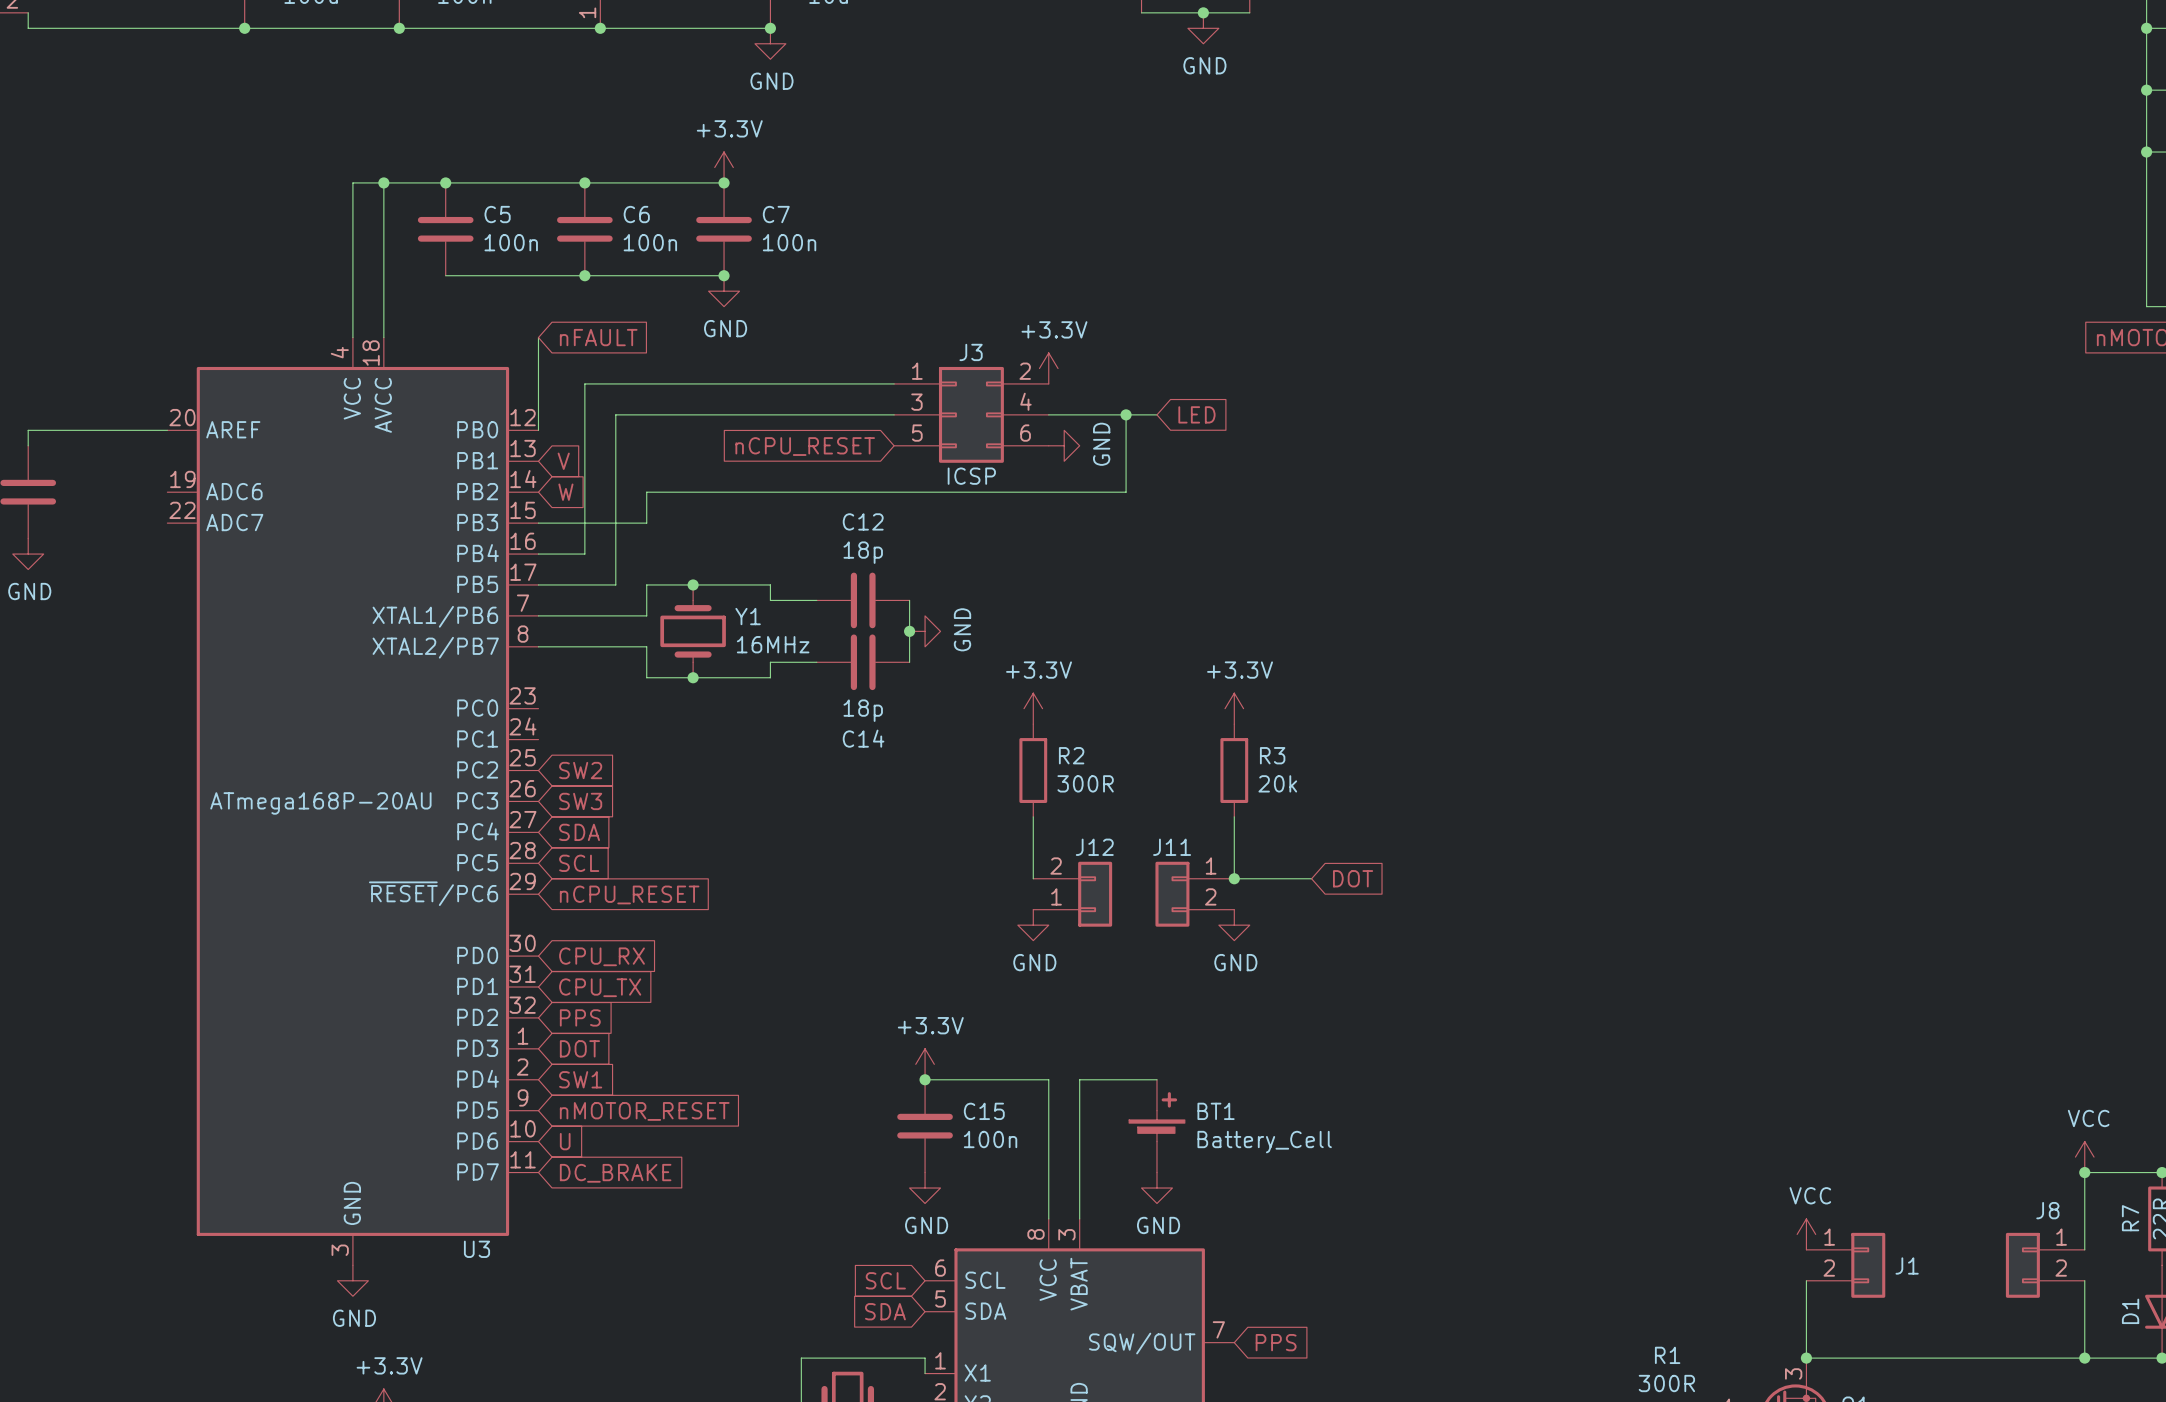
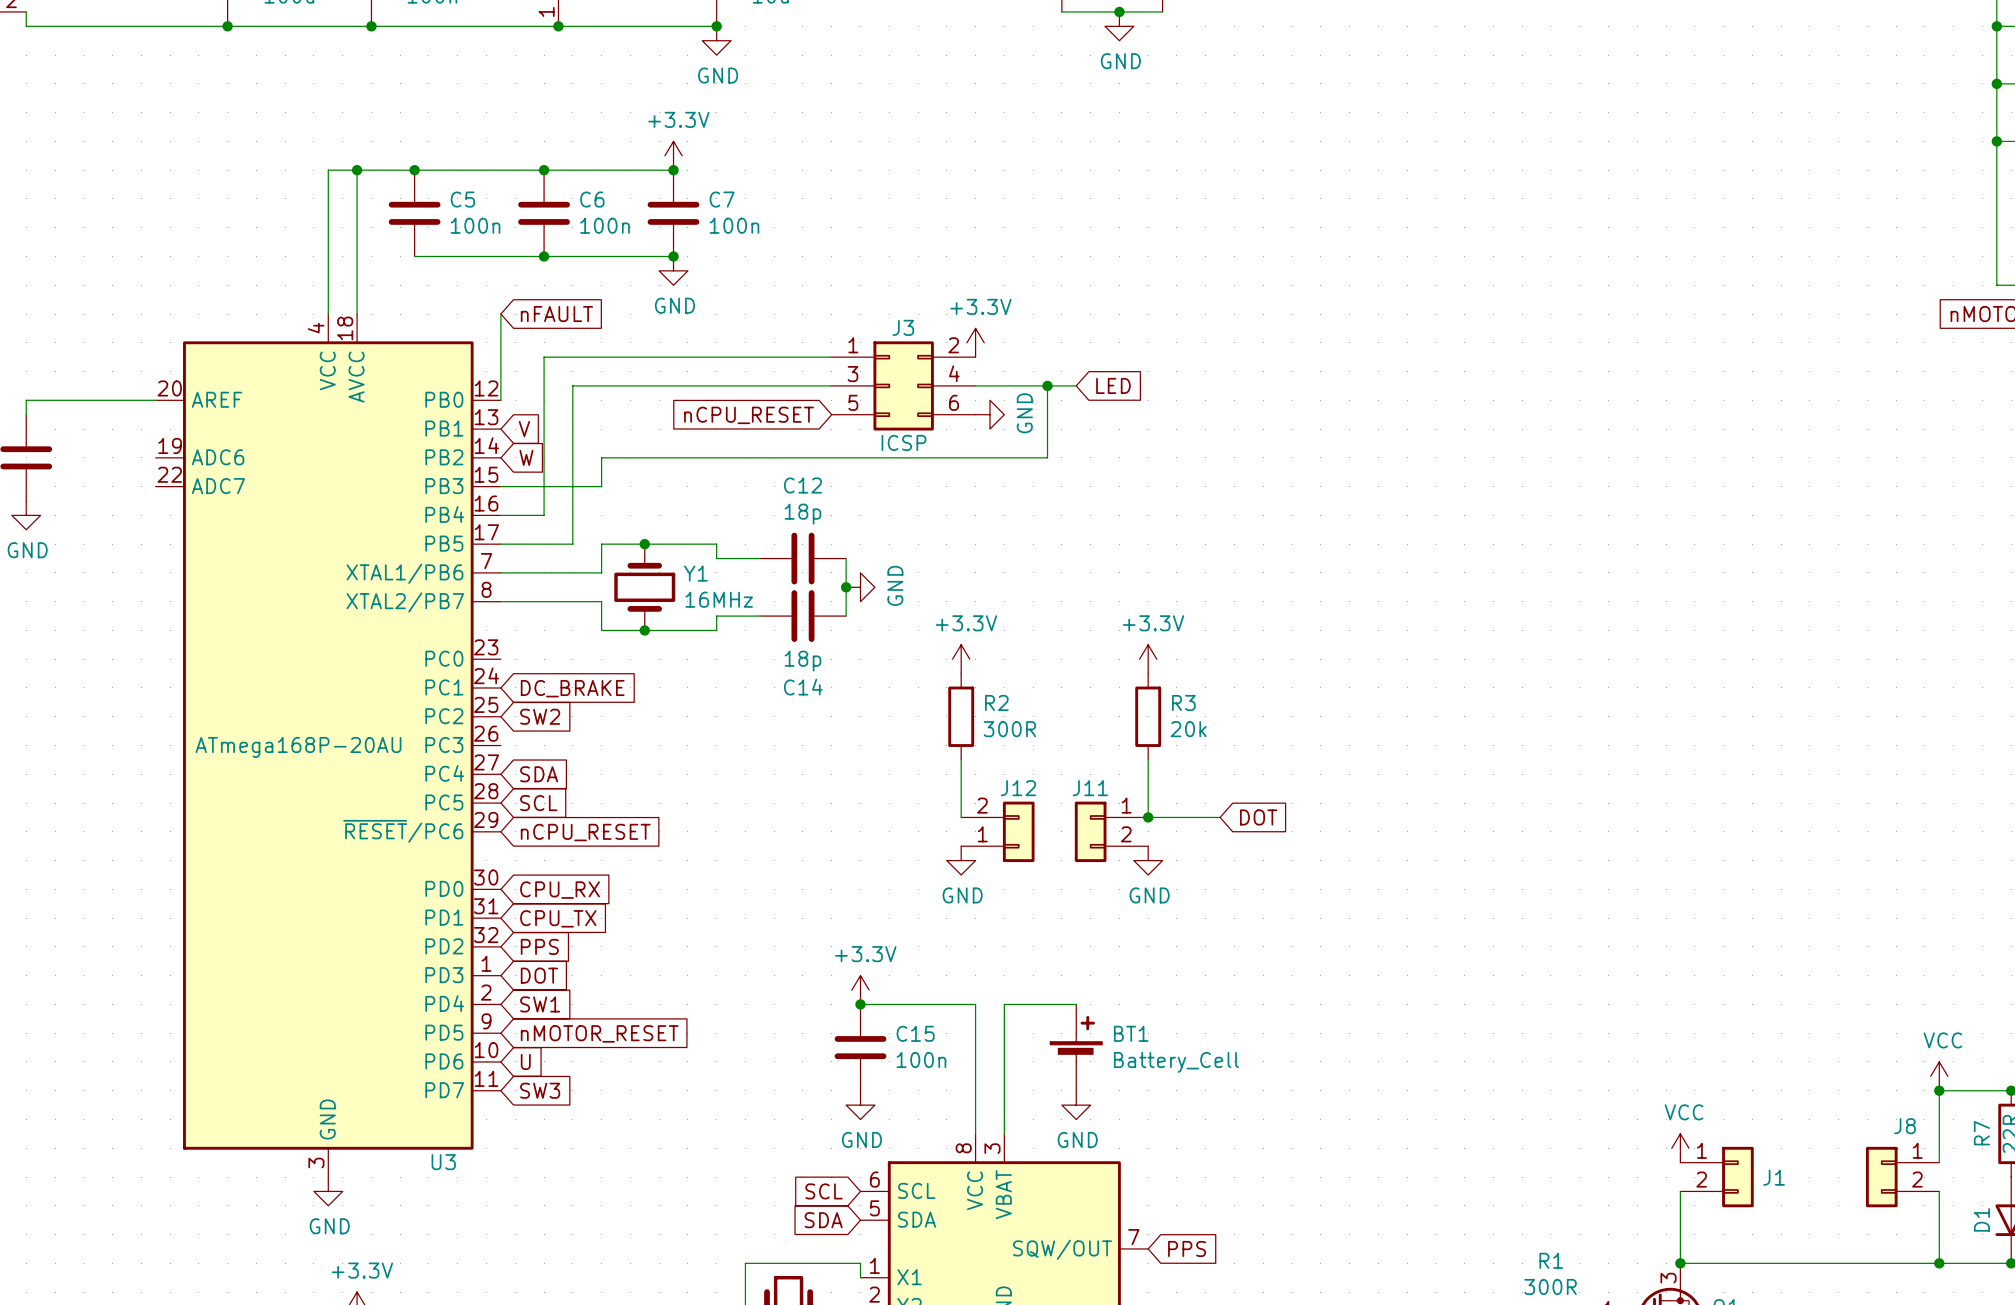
global label: none -> DC_BRAKE (572, 688)
global label: SW3 (580, 801) -> none
global label: DC_BRAKE (615, 1173) -> SW3 (540, 1090)

